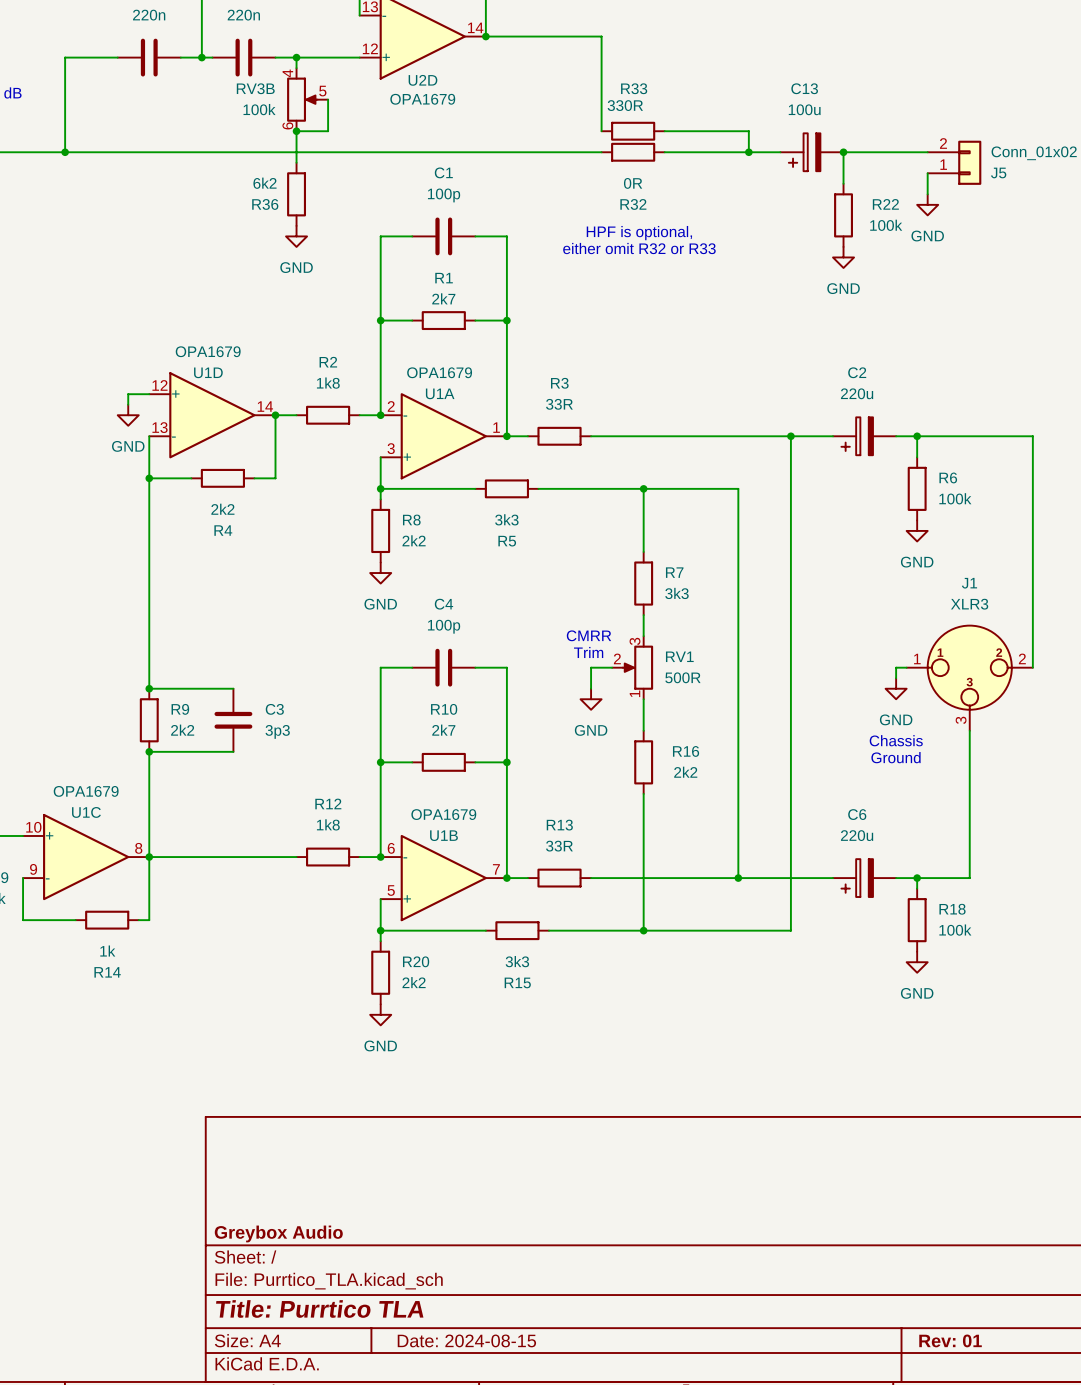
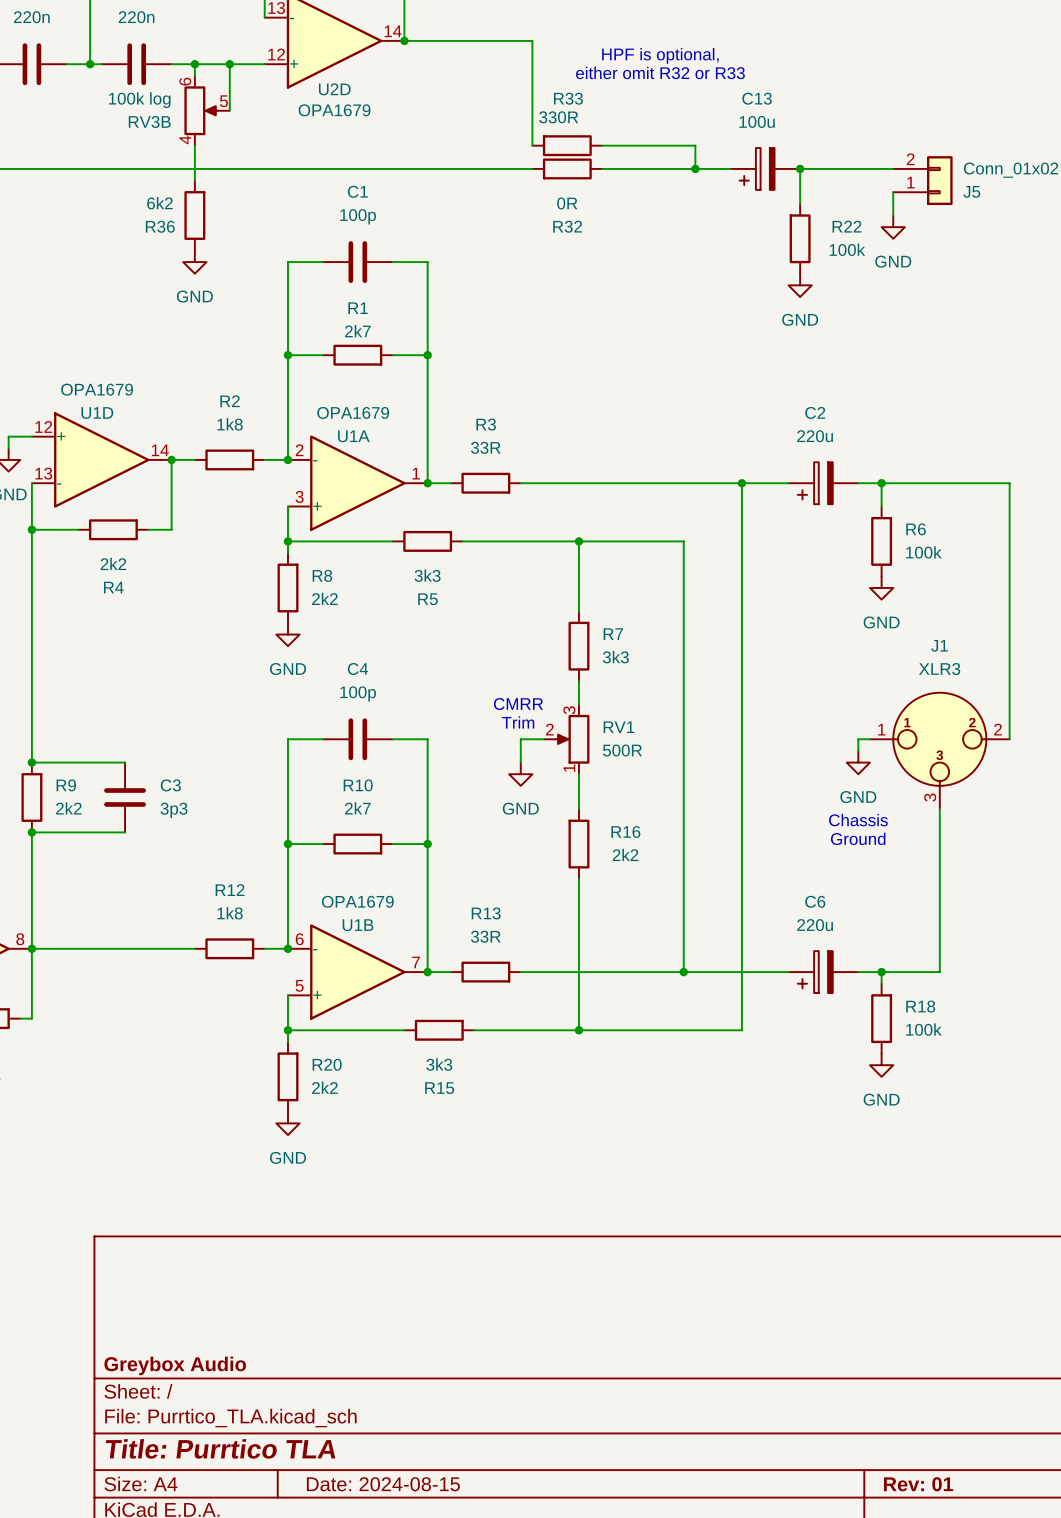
junction: none -> (229, 64)
RV3B flip: as is (302, 99) -> up-down (201, 110)
wire: (328, 99) (328, 131) (296, 131) -> (229, 110) (229, 64)
RV3B value: 100k (259, 109) -> 100k log (139, 100)
junction: (296, 131) -> none
text position: HPF is optional, (639, 233) -> HPF is optional, (660, 55)
text position: either omit R32 or R33 (639, 248) -> either omit R32 or R33 (660, 72)

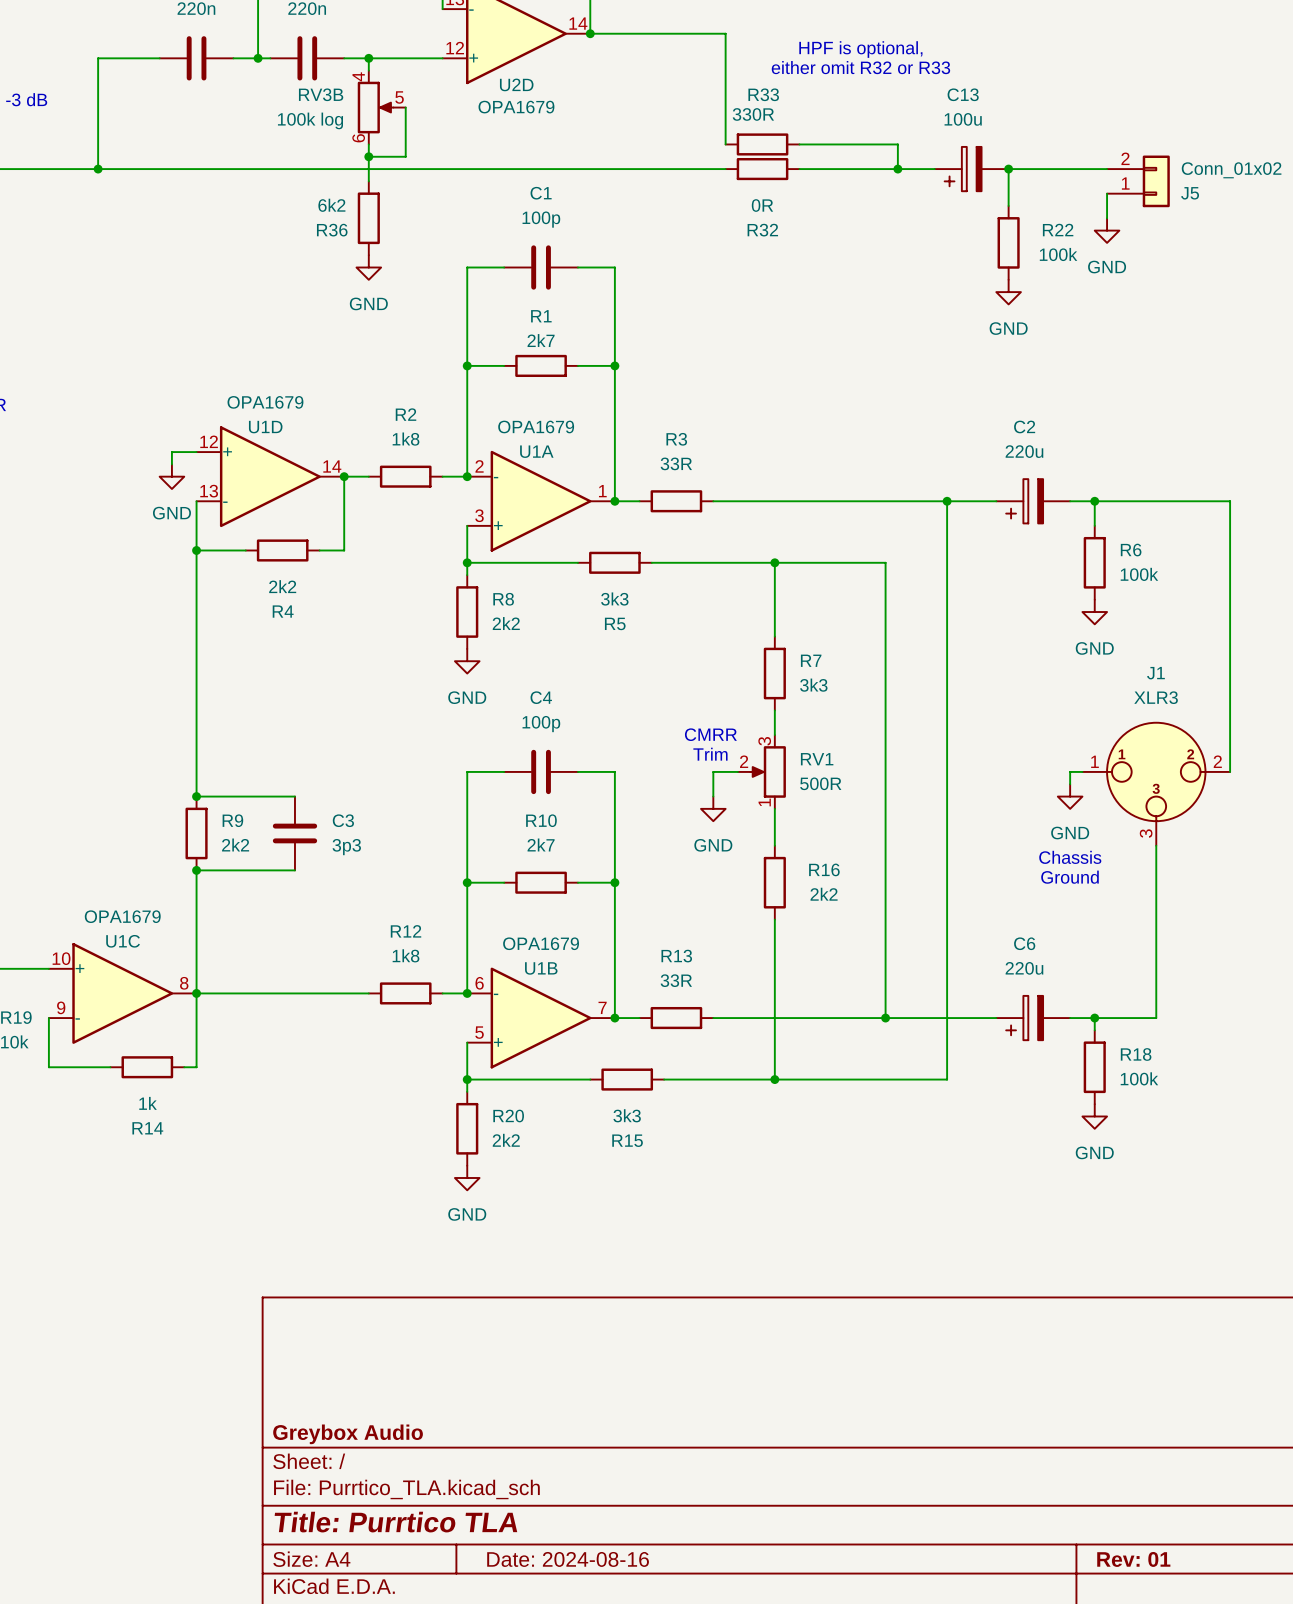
wire: (229, 64) (229, 110) -> (368, 156) (405, 156) (405, 107)
junction: (229, 64) -> none
RV3B flip: as is (201, 110) -> up-down (375, 107)
junction: none -> (368, 156)
title block: Date: 2024-08-15 (383, 1484) -> Date: 2024-08-16 (568, 1559)

